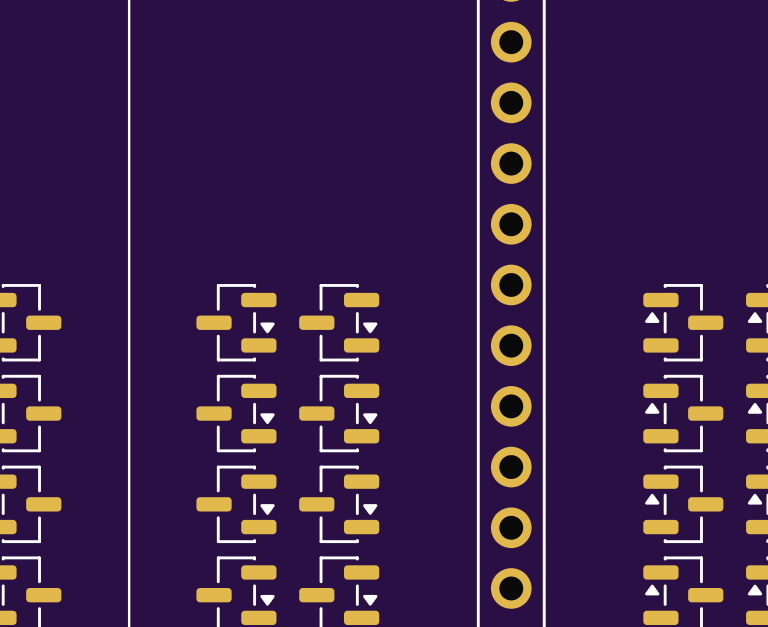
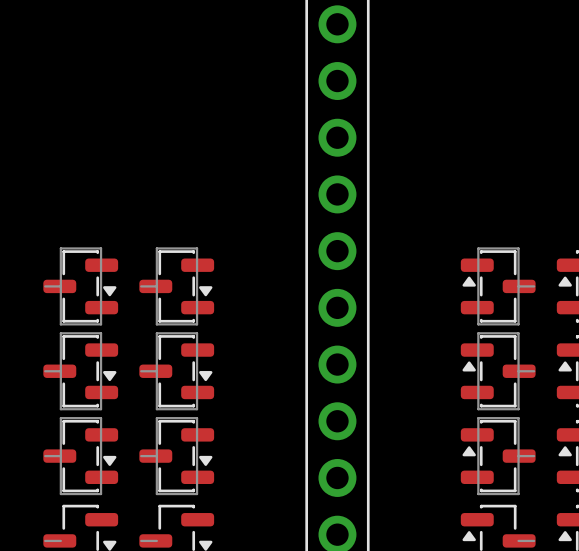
line: none -> (60, 248) (60, 324) (101, 324) (101, 248) (60, 248)
line: none -> (156, 248) (156, 324) (197, 324) (197, 248) (156, 248)
line: none -> (478, 248) (478, 324) (518, 324) (518, 248) (478, 248)
line: none -> (45, 286) (60, 286)
line: none -> (141, 286) (156, 286)
line: none -> (518, 286) (534, 286)
line: none -> (60, 333) (101, 333) (101, 409) (60, 409) (60, 333)
line: none -> (156, 333) (156, 409) (197, 409) (197, 333) (156, 333)
line: none -> (478, 333) (478, 409) (518, 409) (518, 333) (478, 333)
line: none -> (45, 371) (60, 371)
line: none -> (141, 371) (156, 371)
line: none -> (518, 371) (534, 371)
line: none -> (60, 418) (101, 418) (101, 494) (60, 494) (60, 418)
line: none -> (156, 418) (197, 418) (197, 494) (156, 494) (156, 418)
line: none -> (478, 418) (518, 418) (518, 494) (478, 494) (478, 418)
line: none -> (45, 456) (60, 456)
line: none -> (141, 456) (156, 456)
line: none -> (518, 456) (534, 456)
line: none -> (45, 540) (60, 540)
line: none -> (141, 540) (156, 540)
line: none -> (518, 540) (534, 540)

